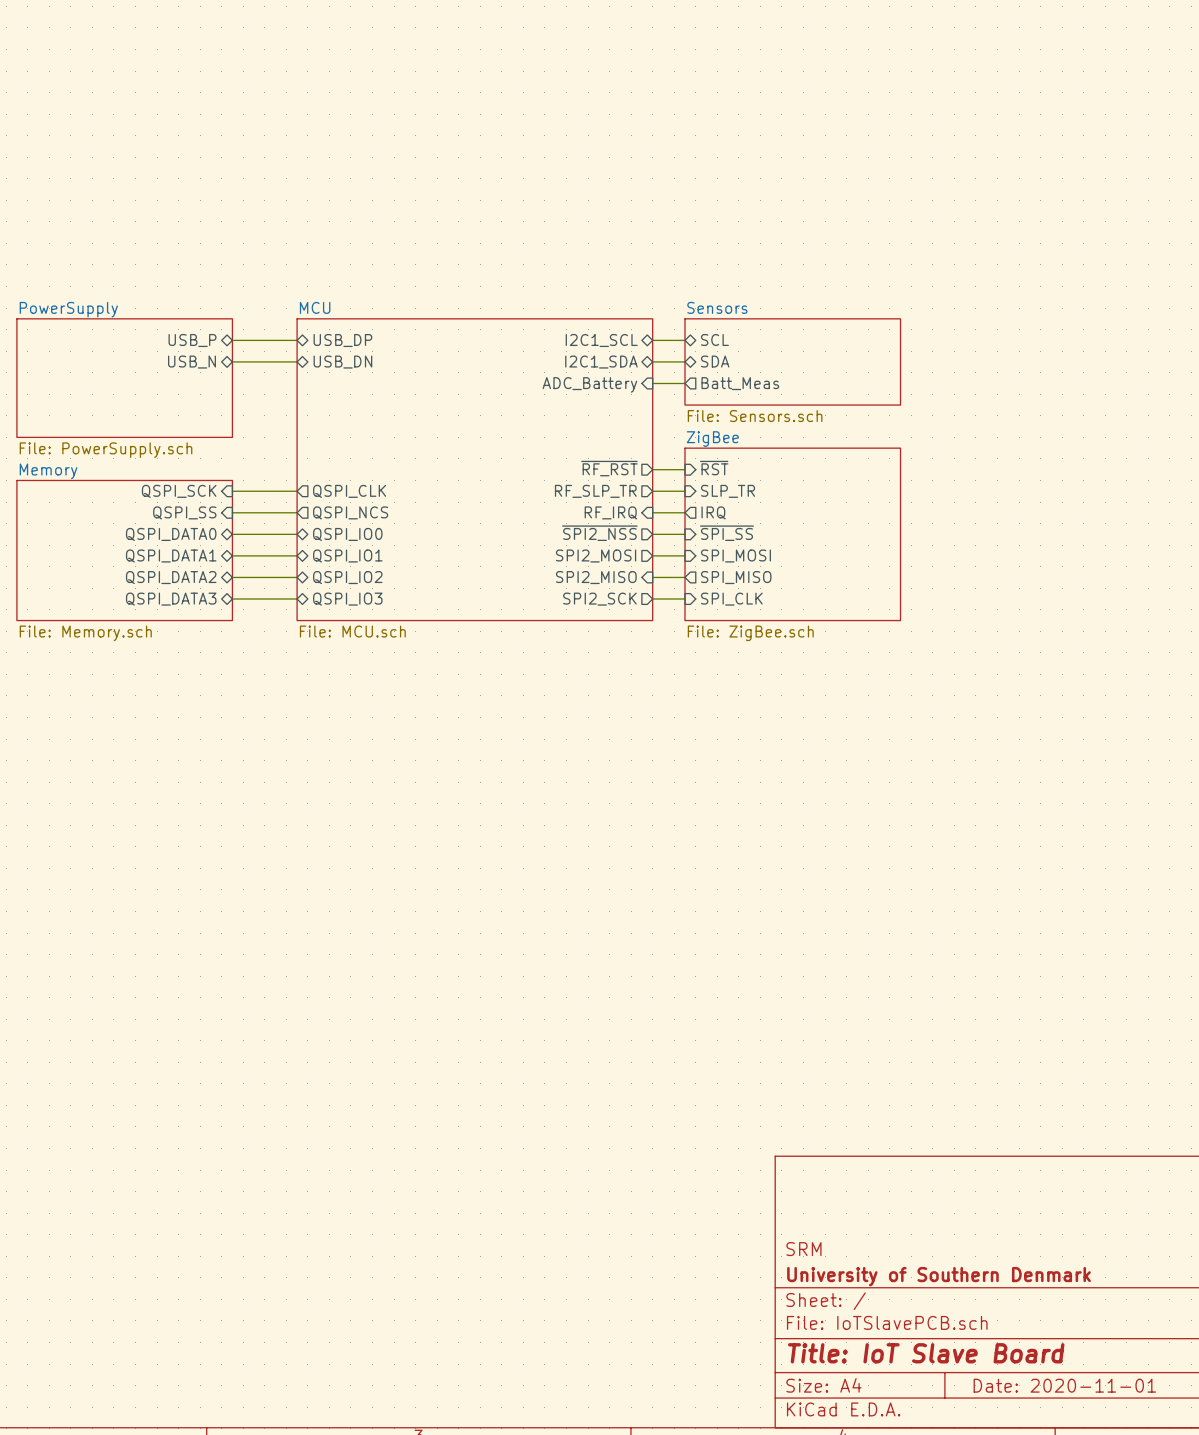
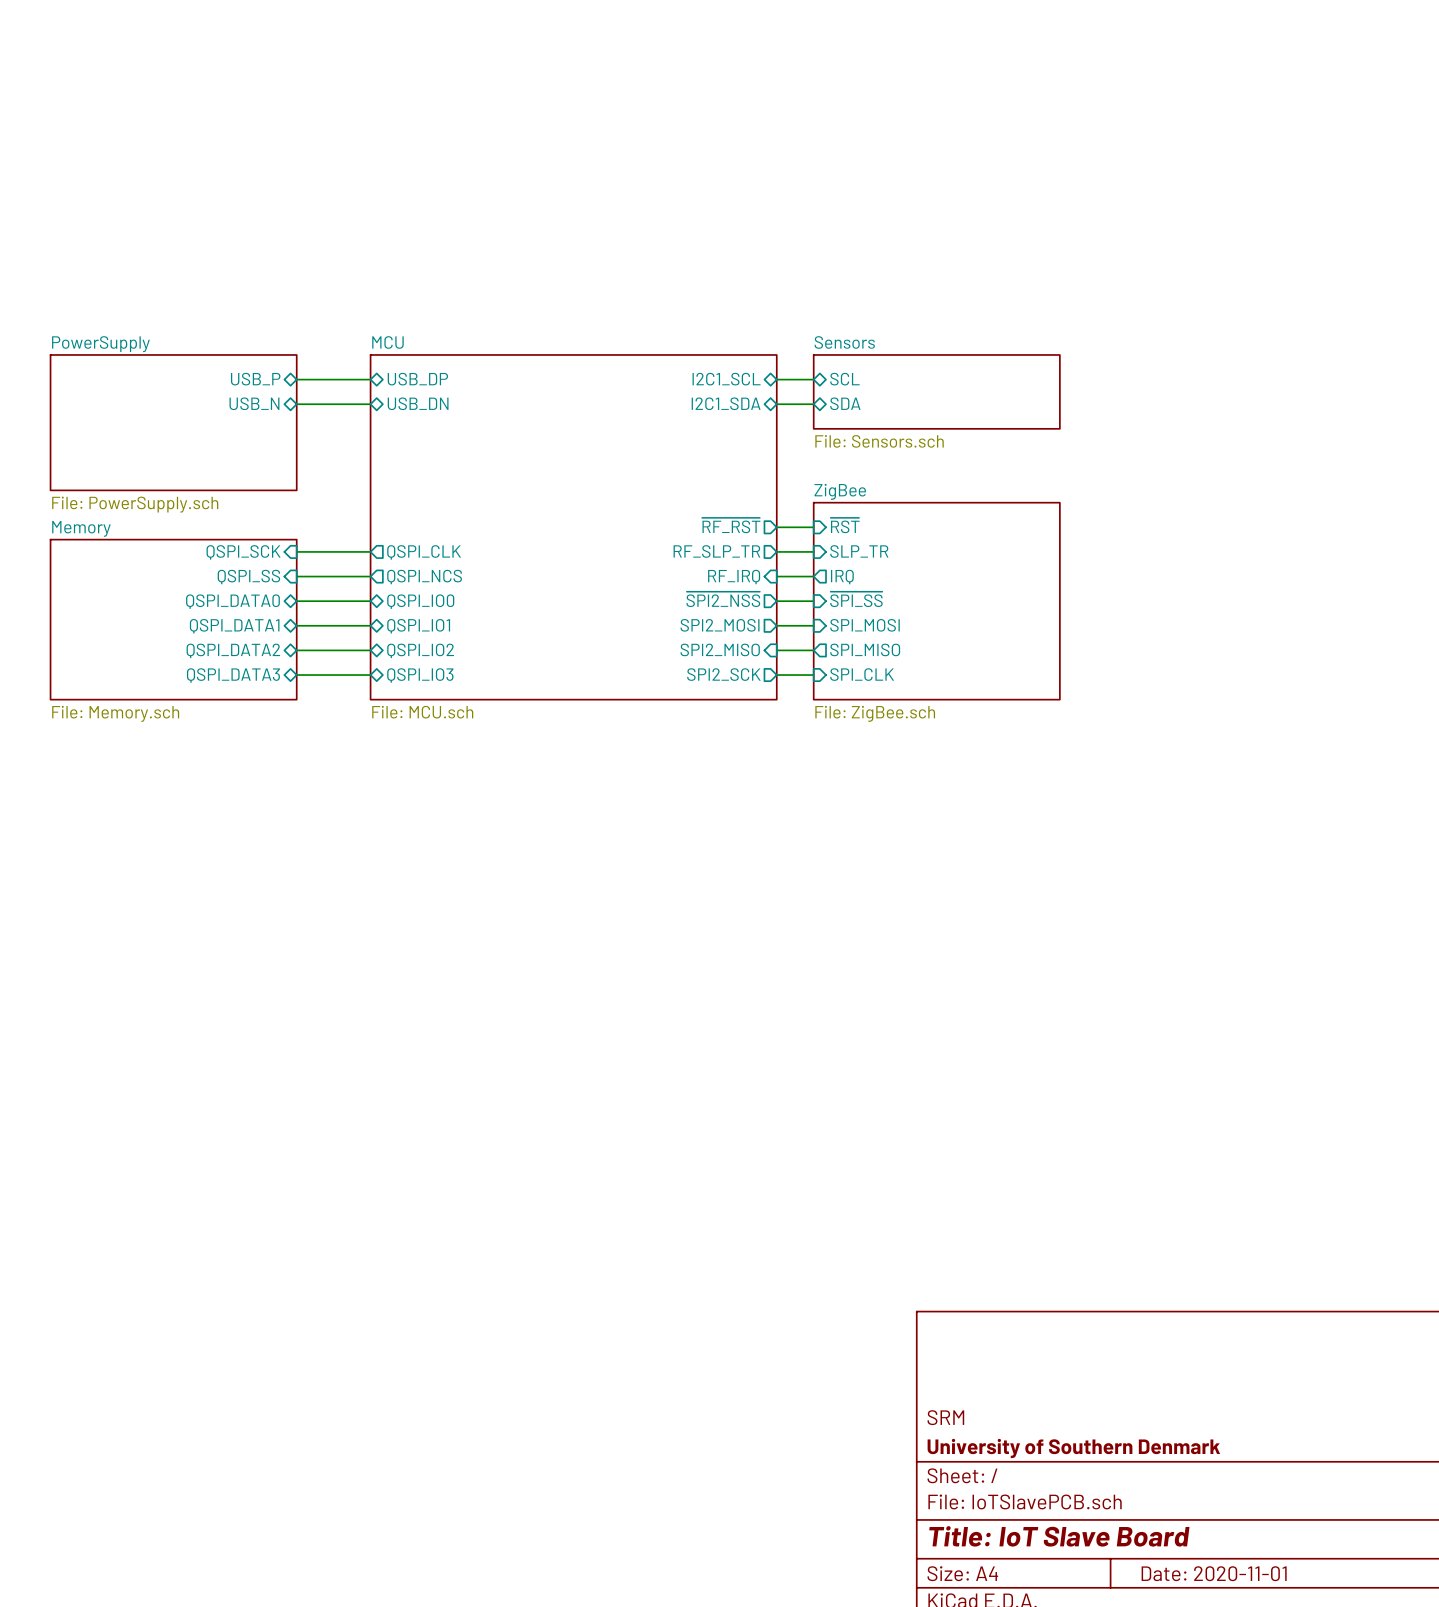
sheet Sensors: none -> File: Sensors.sch (936, 391)
sheet Sensors: File: Sensors.sch (792, 361) -> none
wire: (652, 383) (685, 383) -> none
sheet pin: Batt_Meas (740, 383) -> none
sheet pin: ADC_Battery (589, 384) -> none

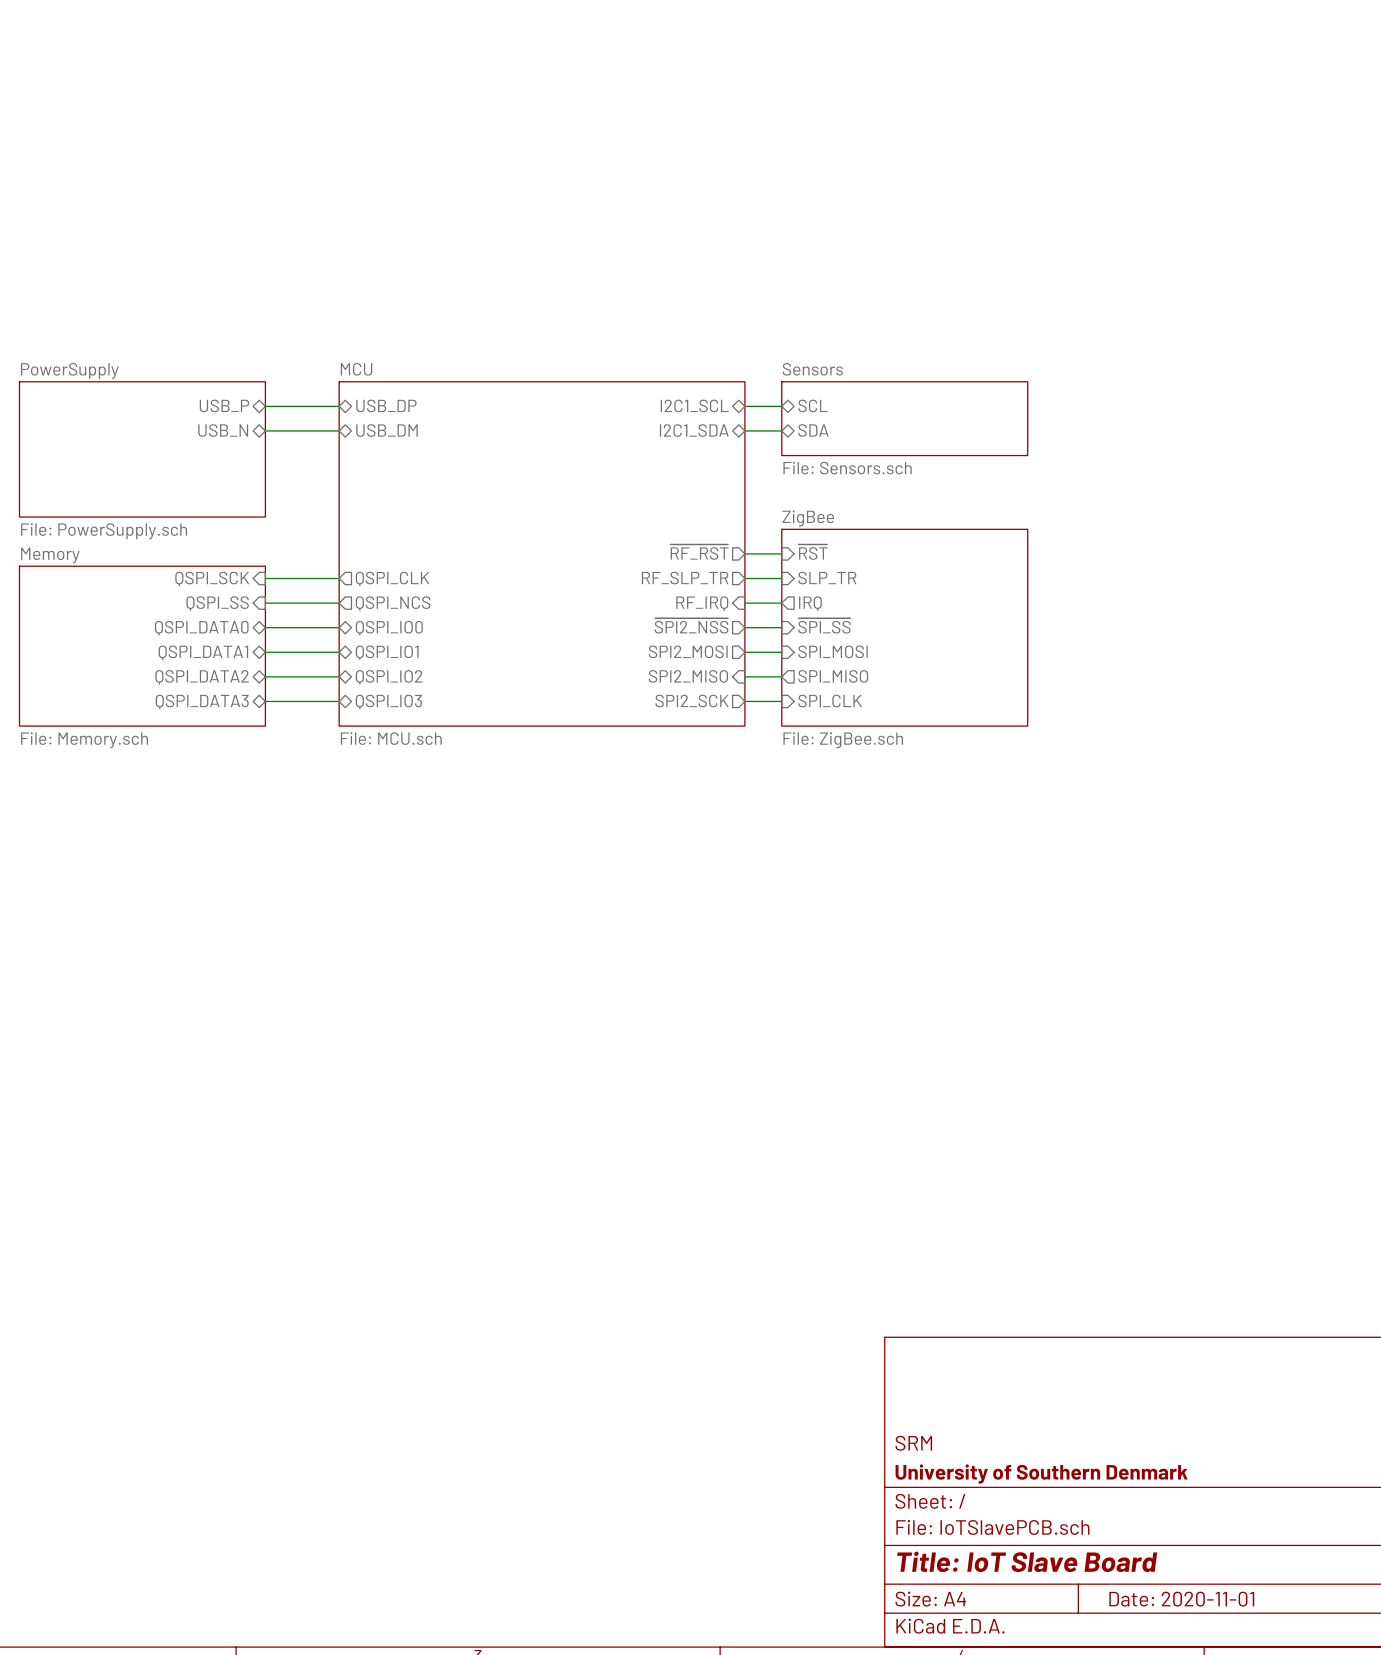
sheet pin: USB_DN (418, 403) -> USB_DM (387, 430)

